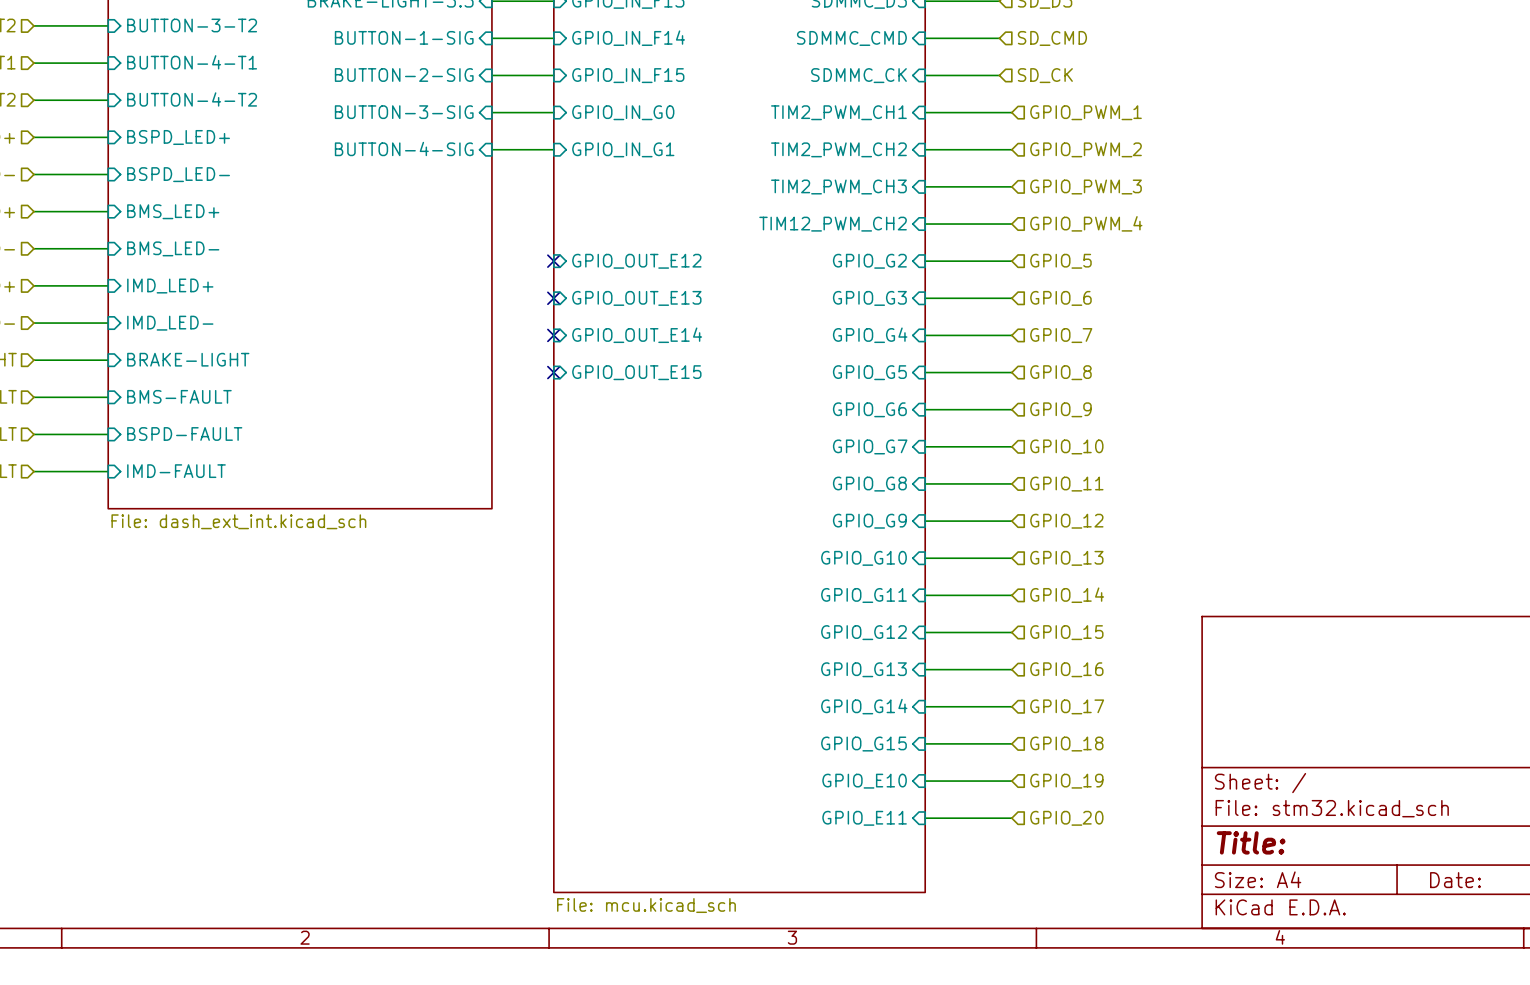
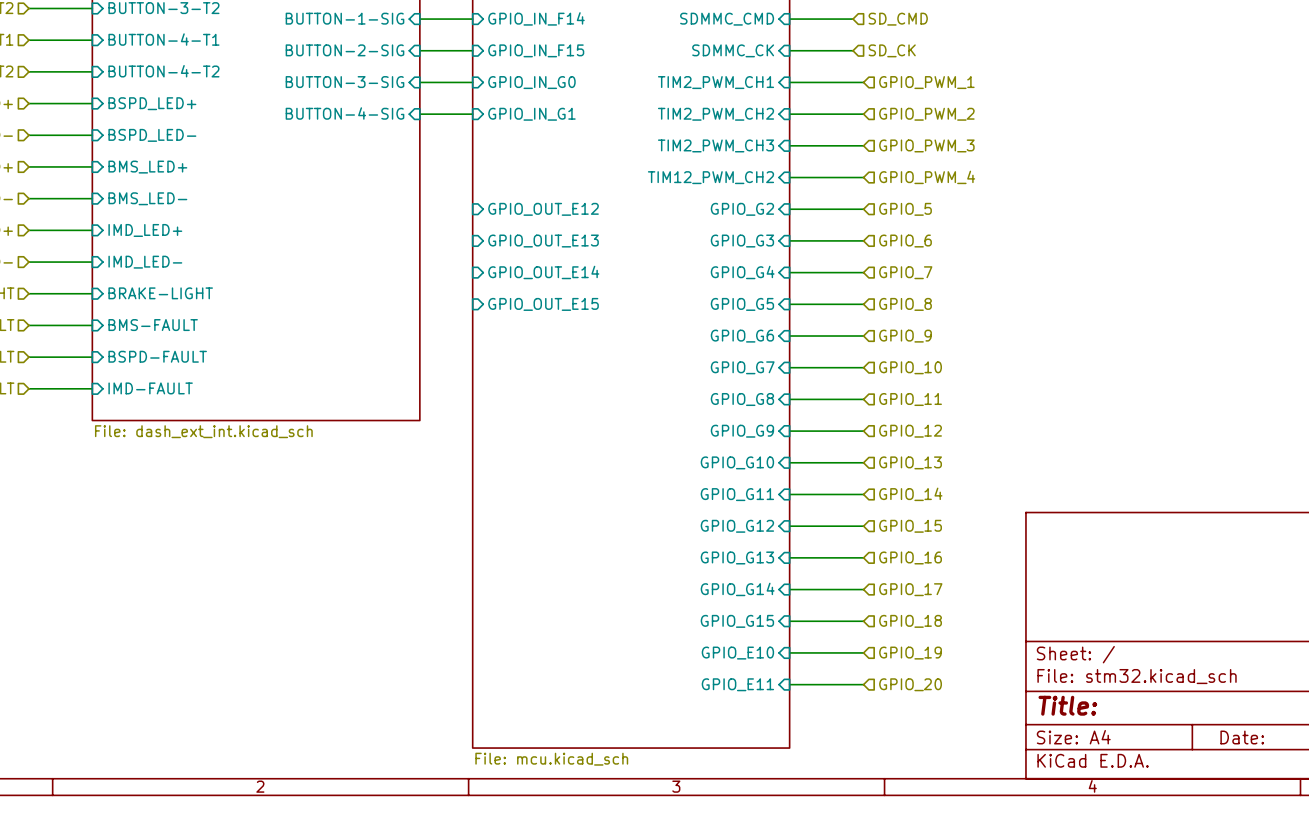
no-connect mark: (553, 261) -> none
no-connect mark: (553, 298) -> none
no-connect mark: (553, 335) -> none
no-connect mark: (553, 372) -> none

